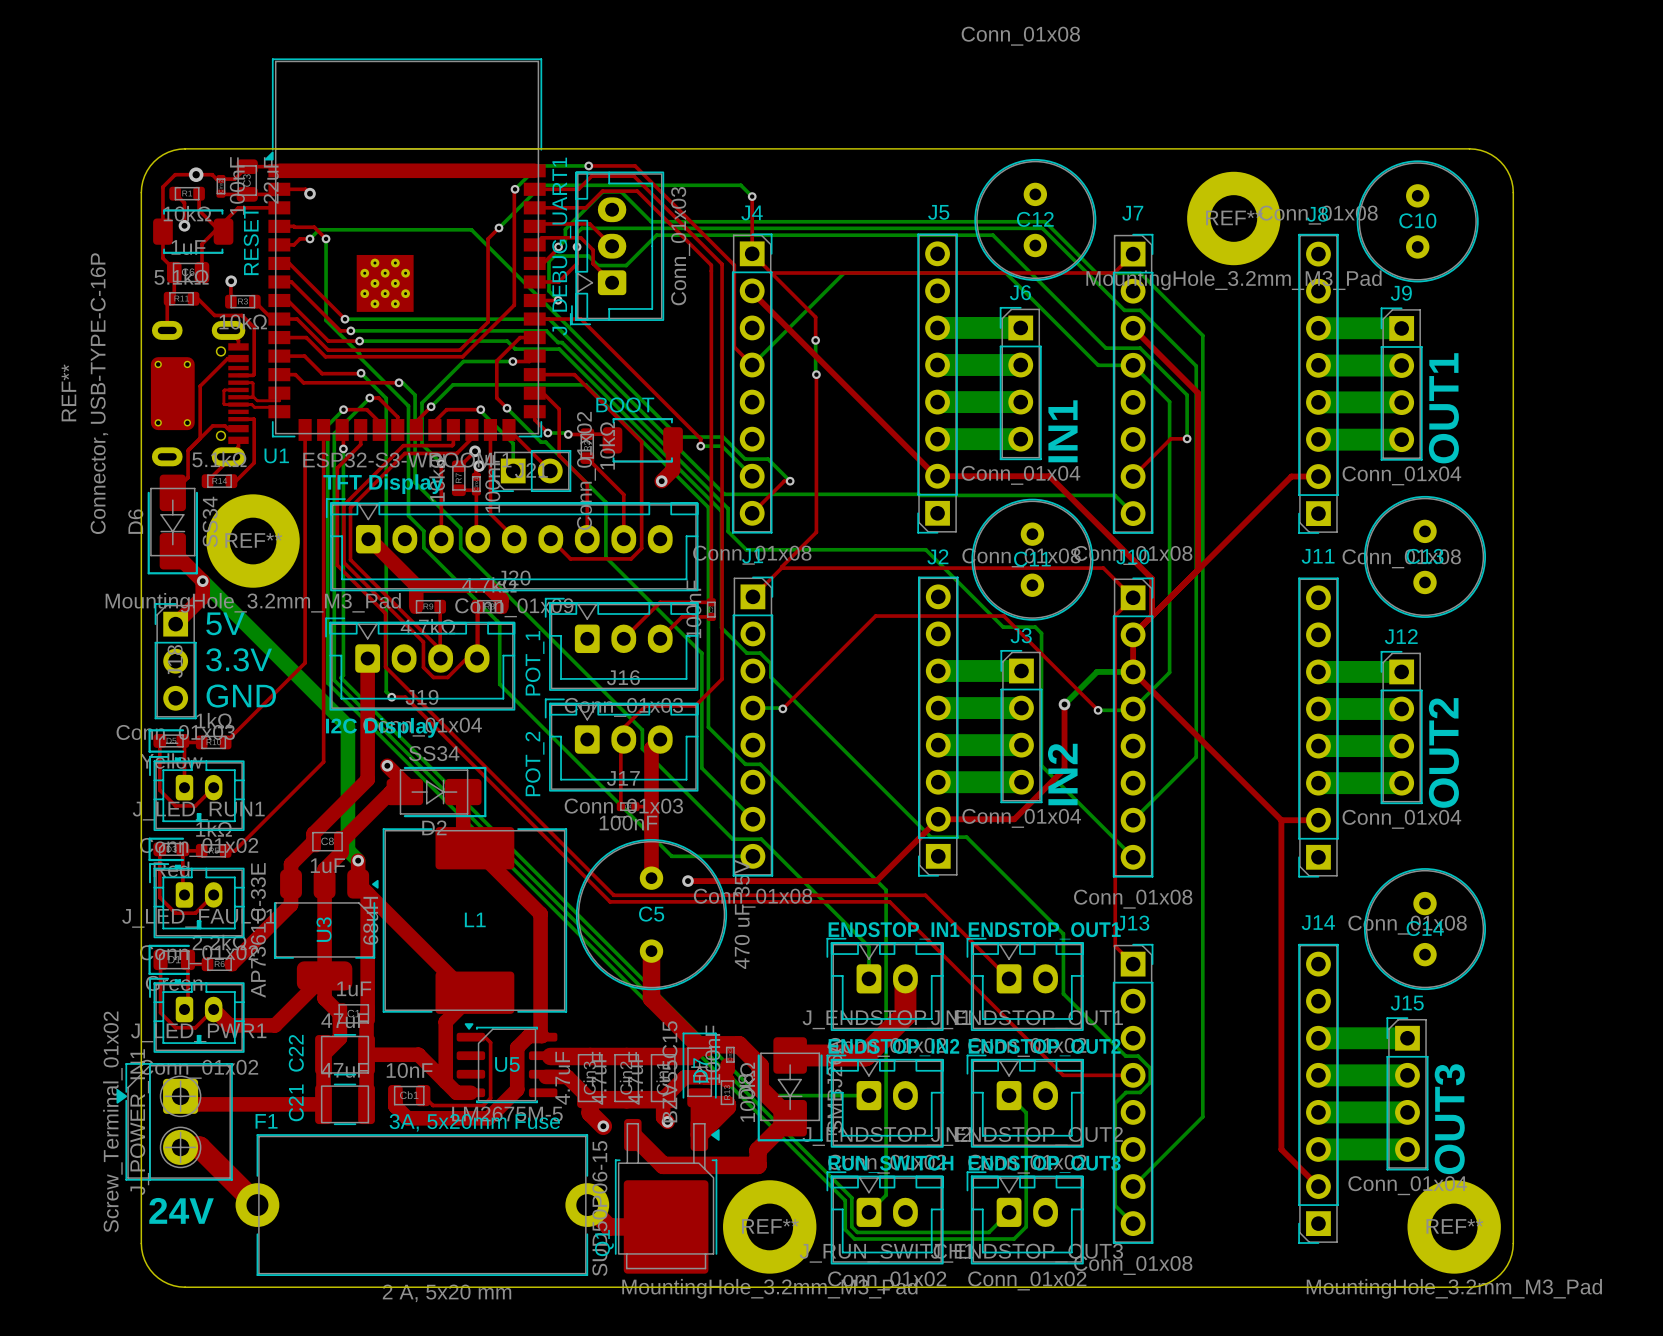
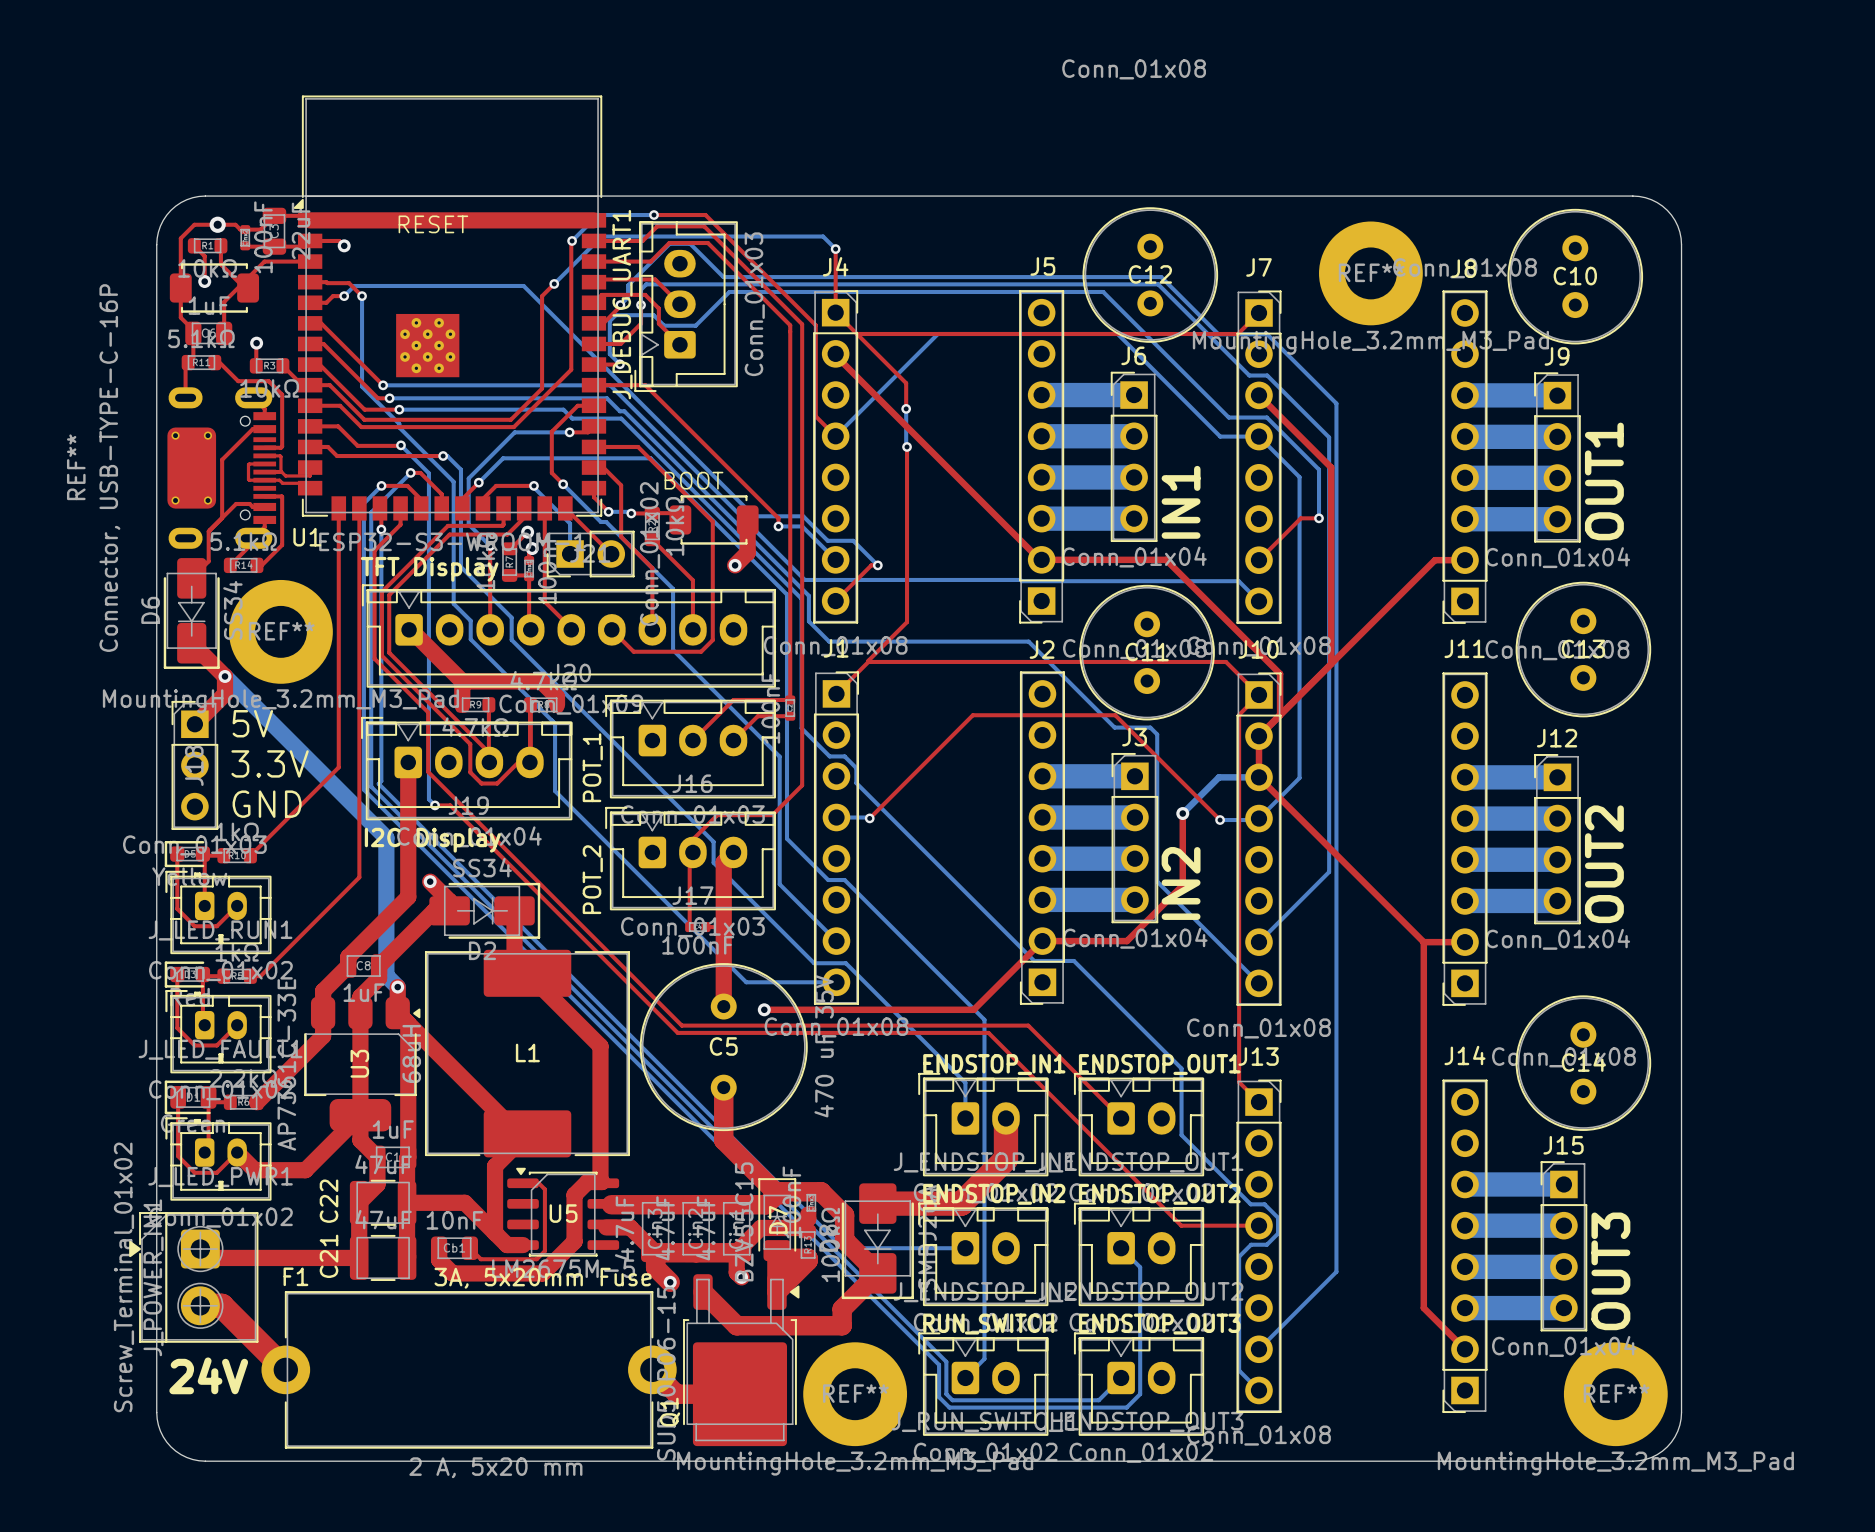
text rotation: 0° (251, 240) -> 90° clockwise (433, 224)
text position: RESET (251, 240) -> RESET (433, 224)

